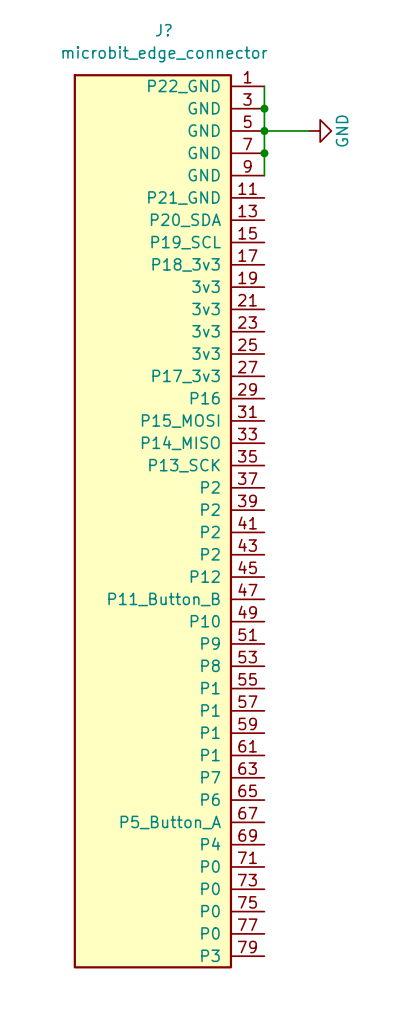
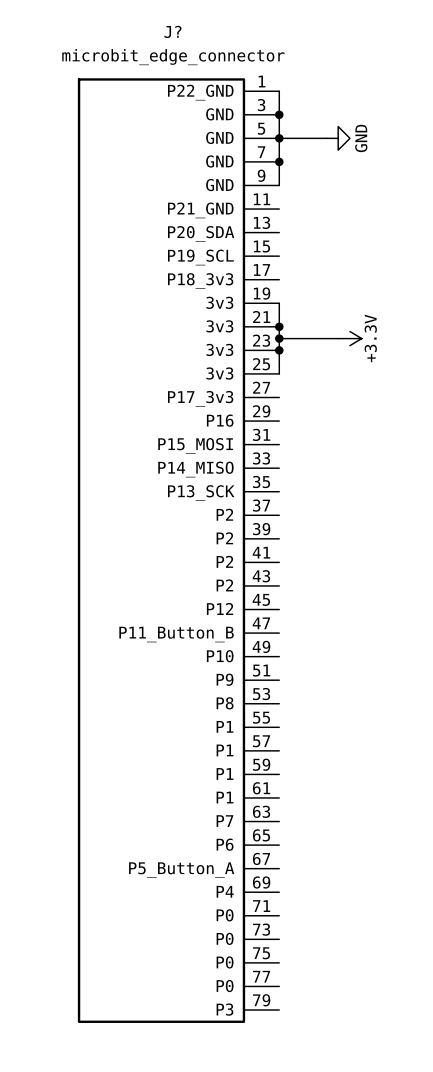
wire: none -> (279, 303) (279, 373)
junction: none -> (279, 326)
wire: none -> (279, 338) (338, 338)
junction: none -> (279, 338)
power symbol: none -> +3.3V (349, 338)
junction: none -> (279, 350)

